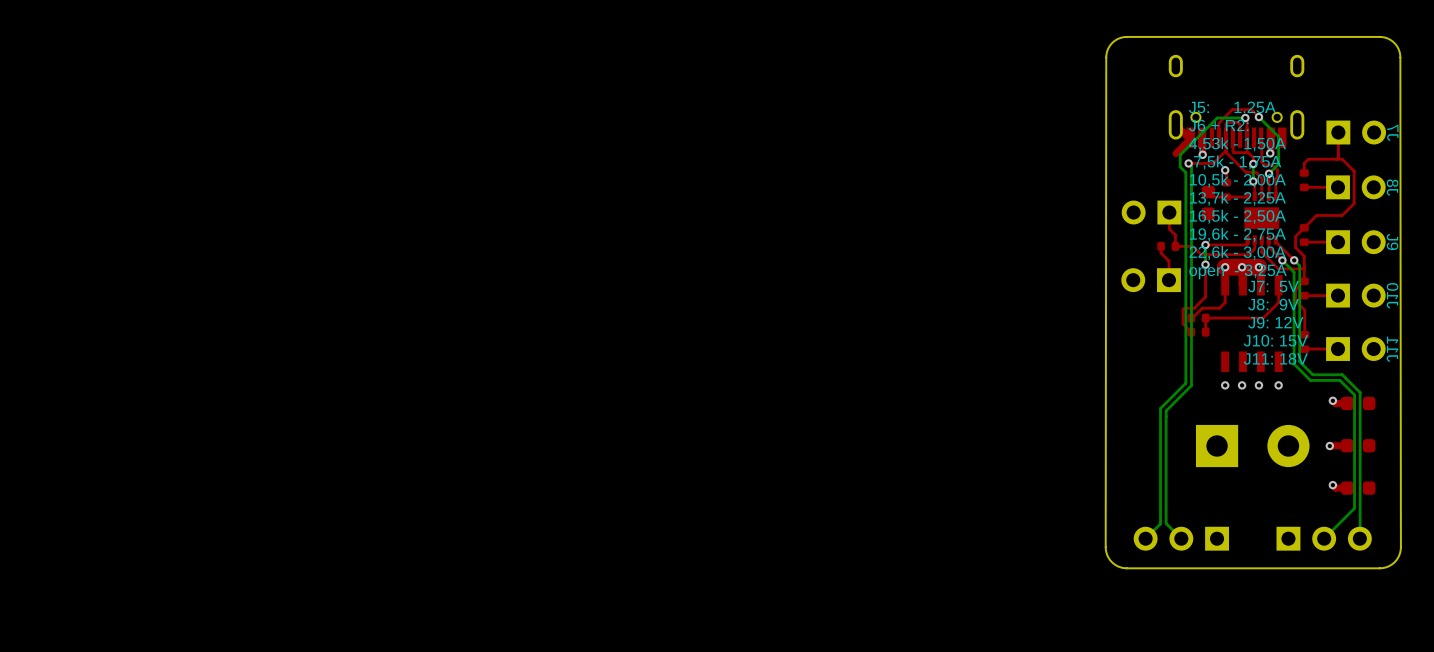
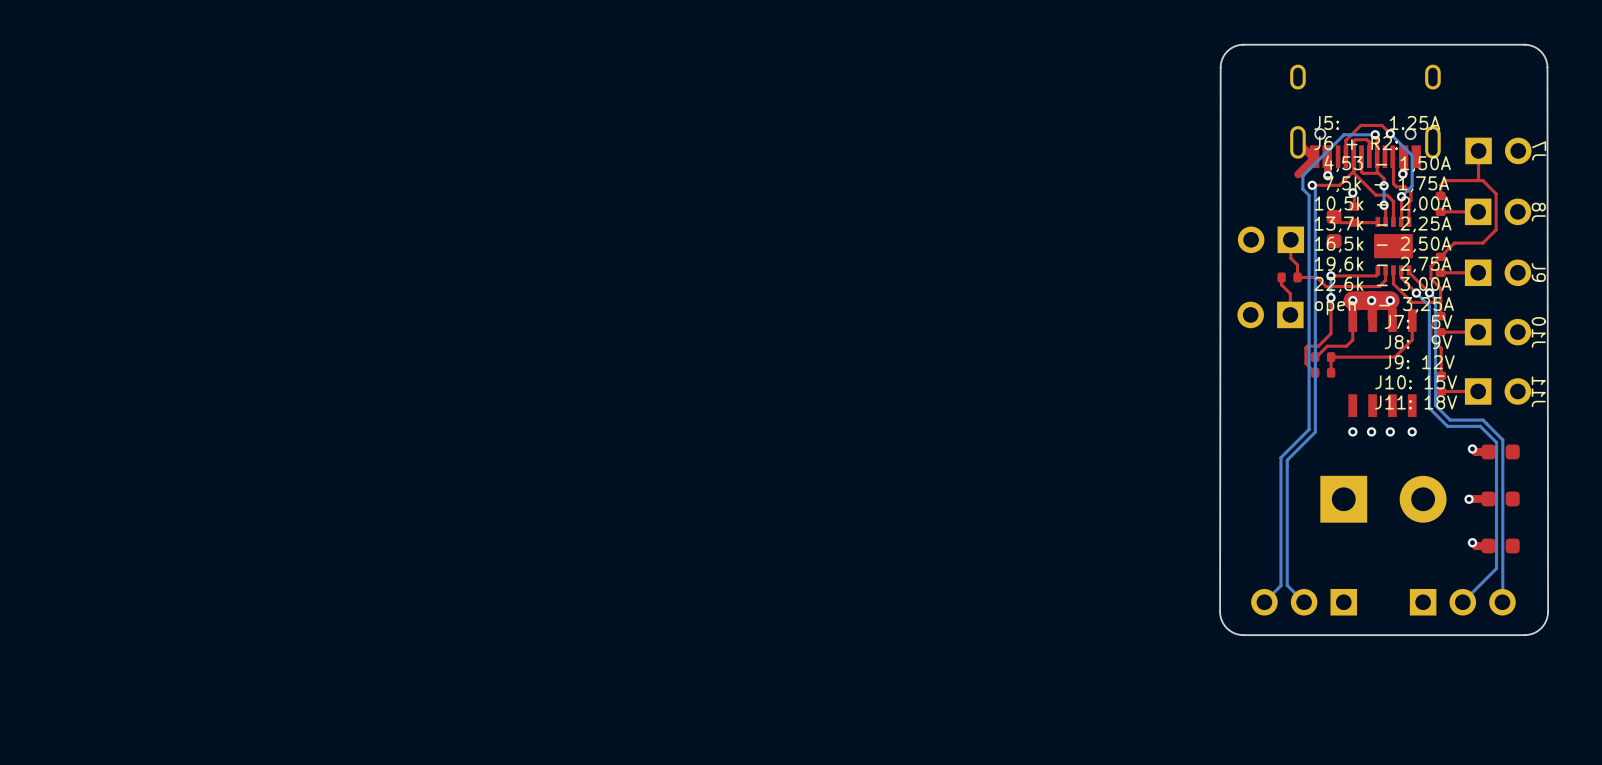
text: 4,53k - 1,50A (1237, 144) -> 4,53 - 1,50A (1387, 163)

